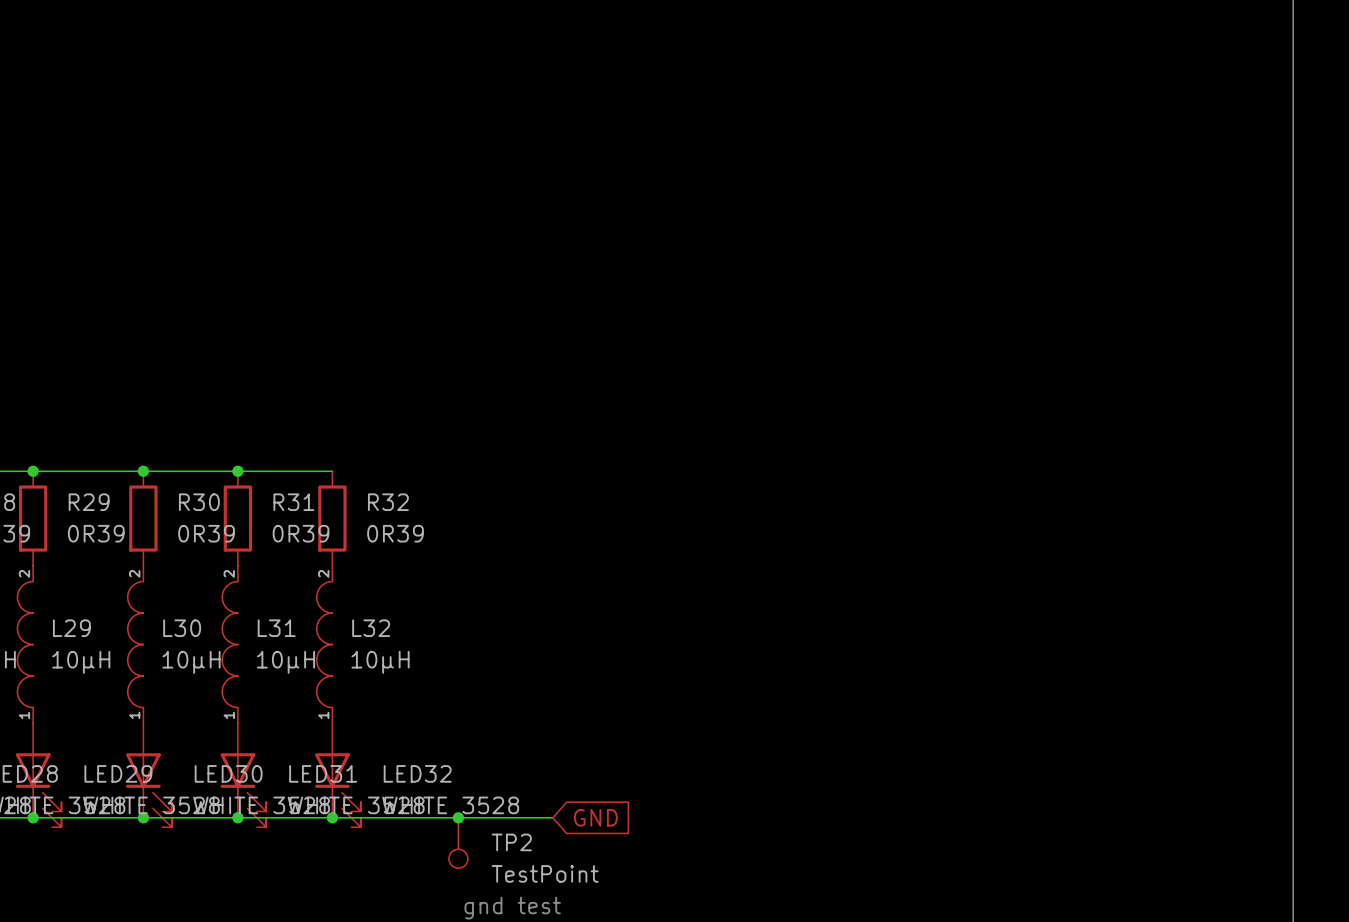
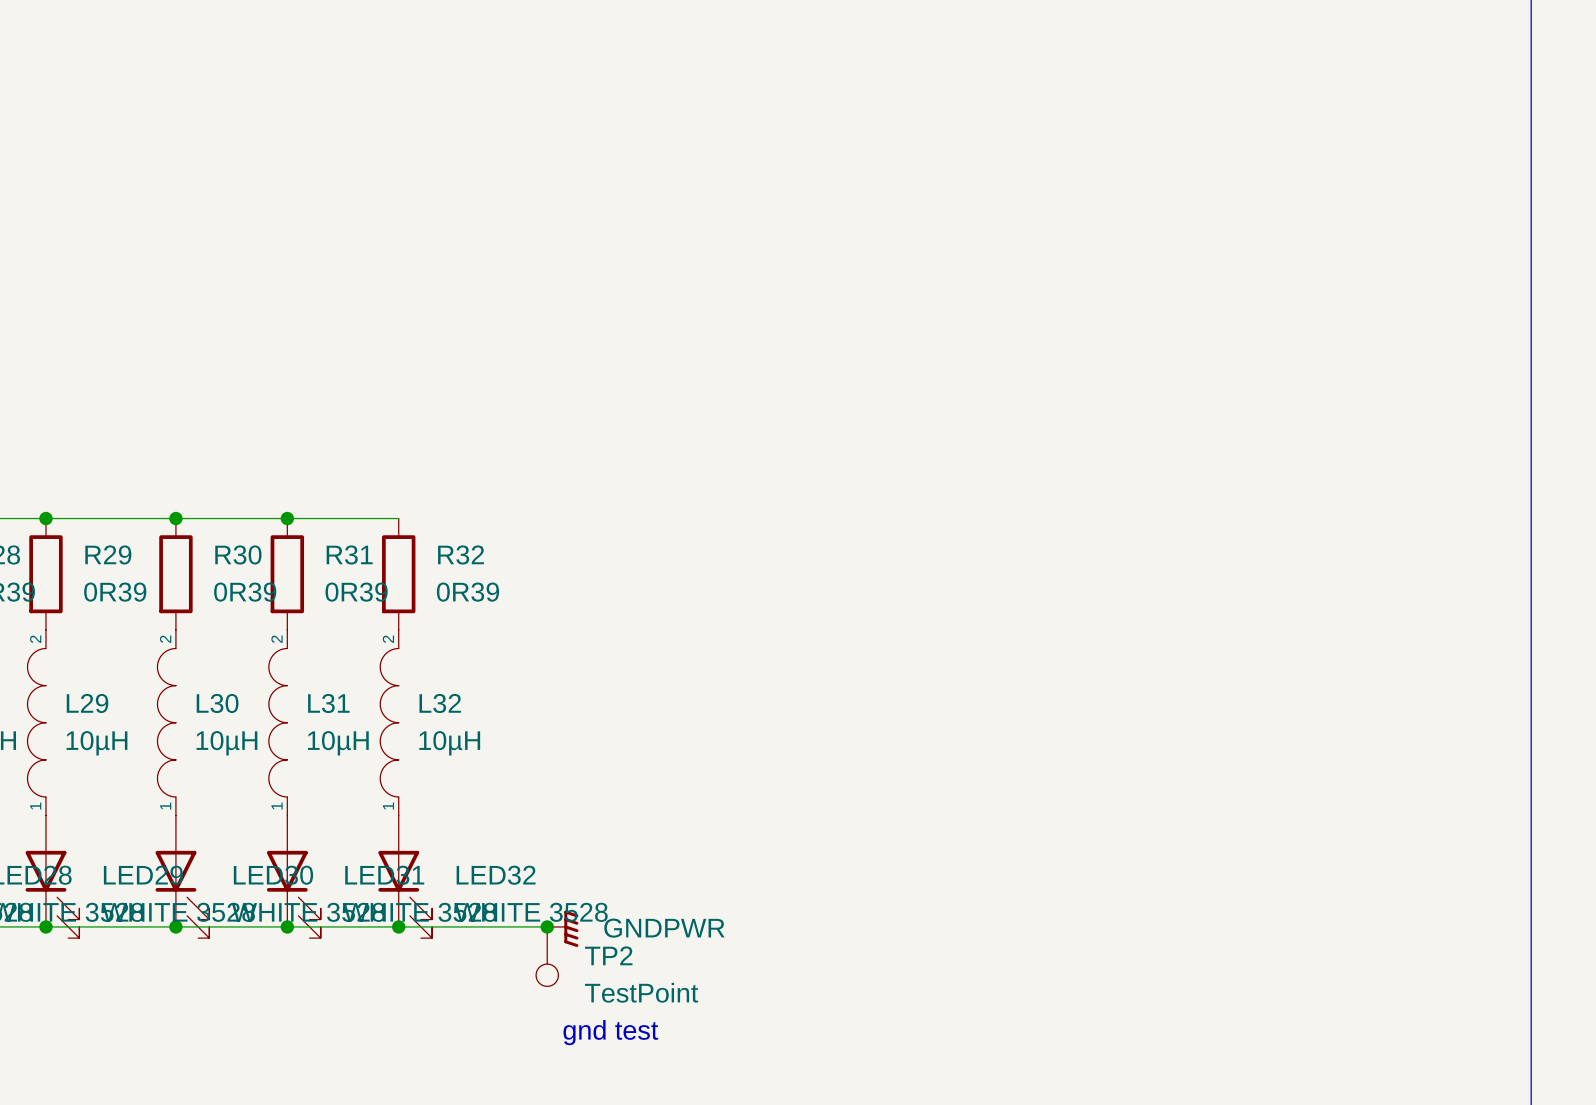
wire: (458, 817) (552, 817) -> none
global label: GND (595, 817) -> none
power symbol: none -> GNDPWR (562, 928)

